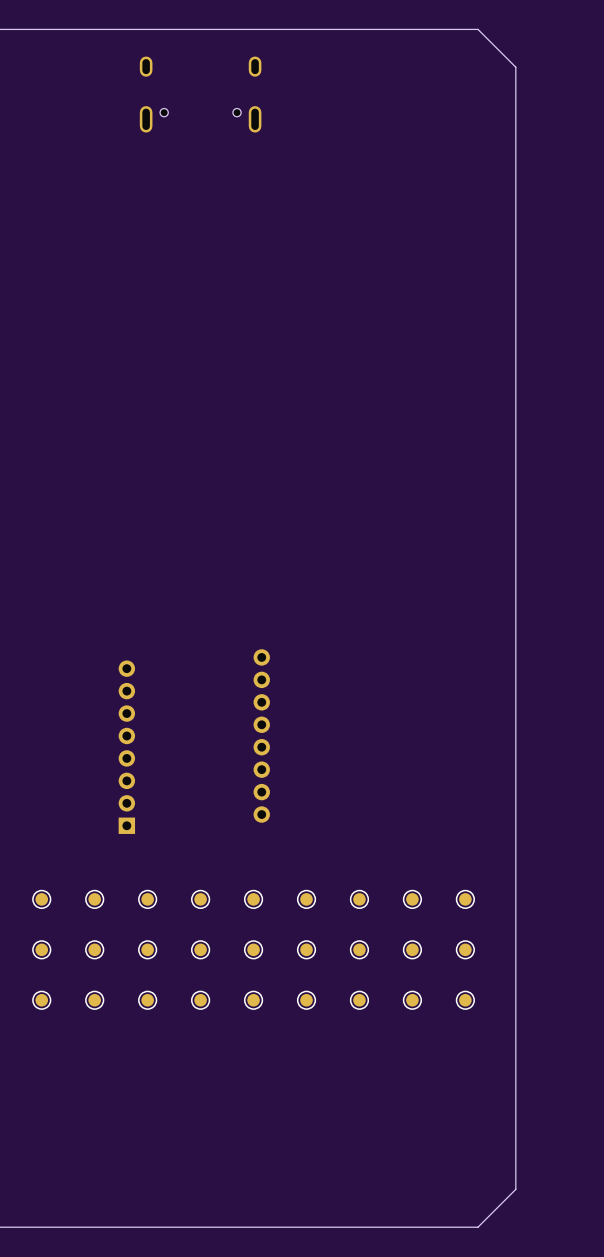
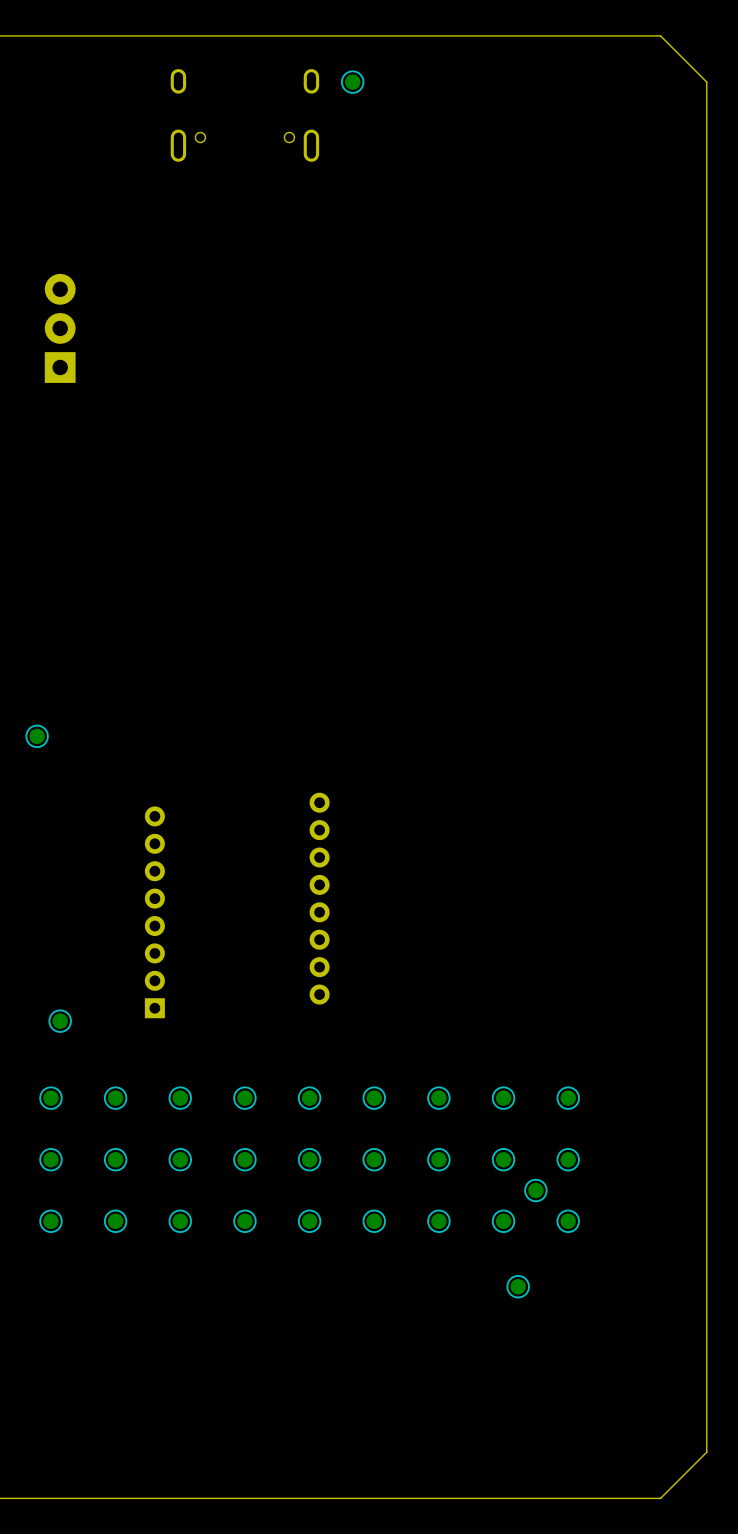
board edge: (477, 29) (515, 67) (515, 1189) (477, 1227) -> (583, 35) (660, 35) (706, 82) (706, 1452) (660, 1498) (583, 1498)
part: none -> (352, 82)
part: none -> (60, 328)
part: none -> (37, 736)
part: none -> (60, 1021)
part: none -> (535, 1190)
part: none -> (518, 1286)

